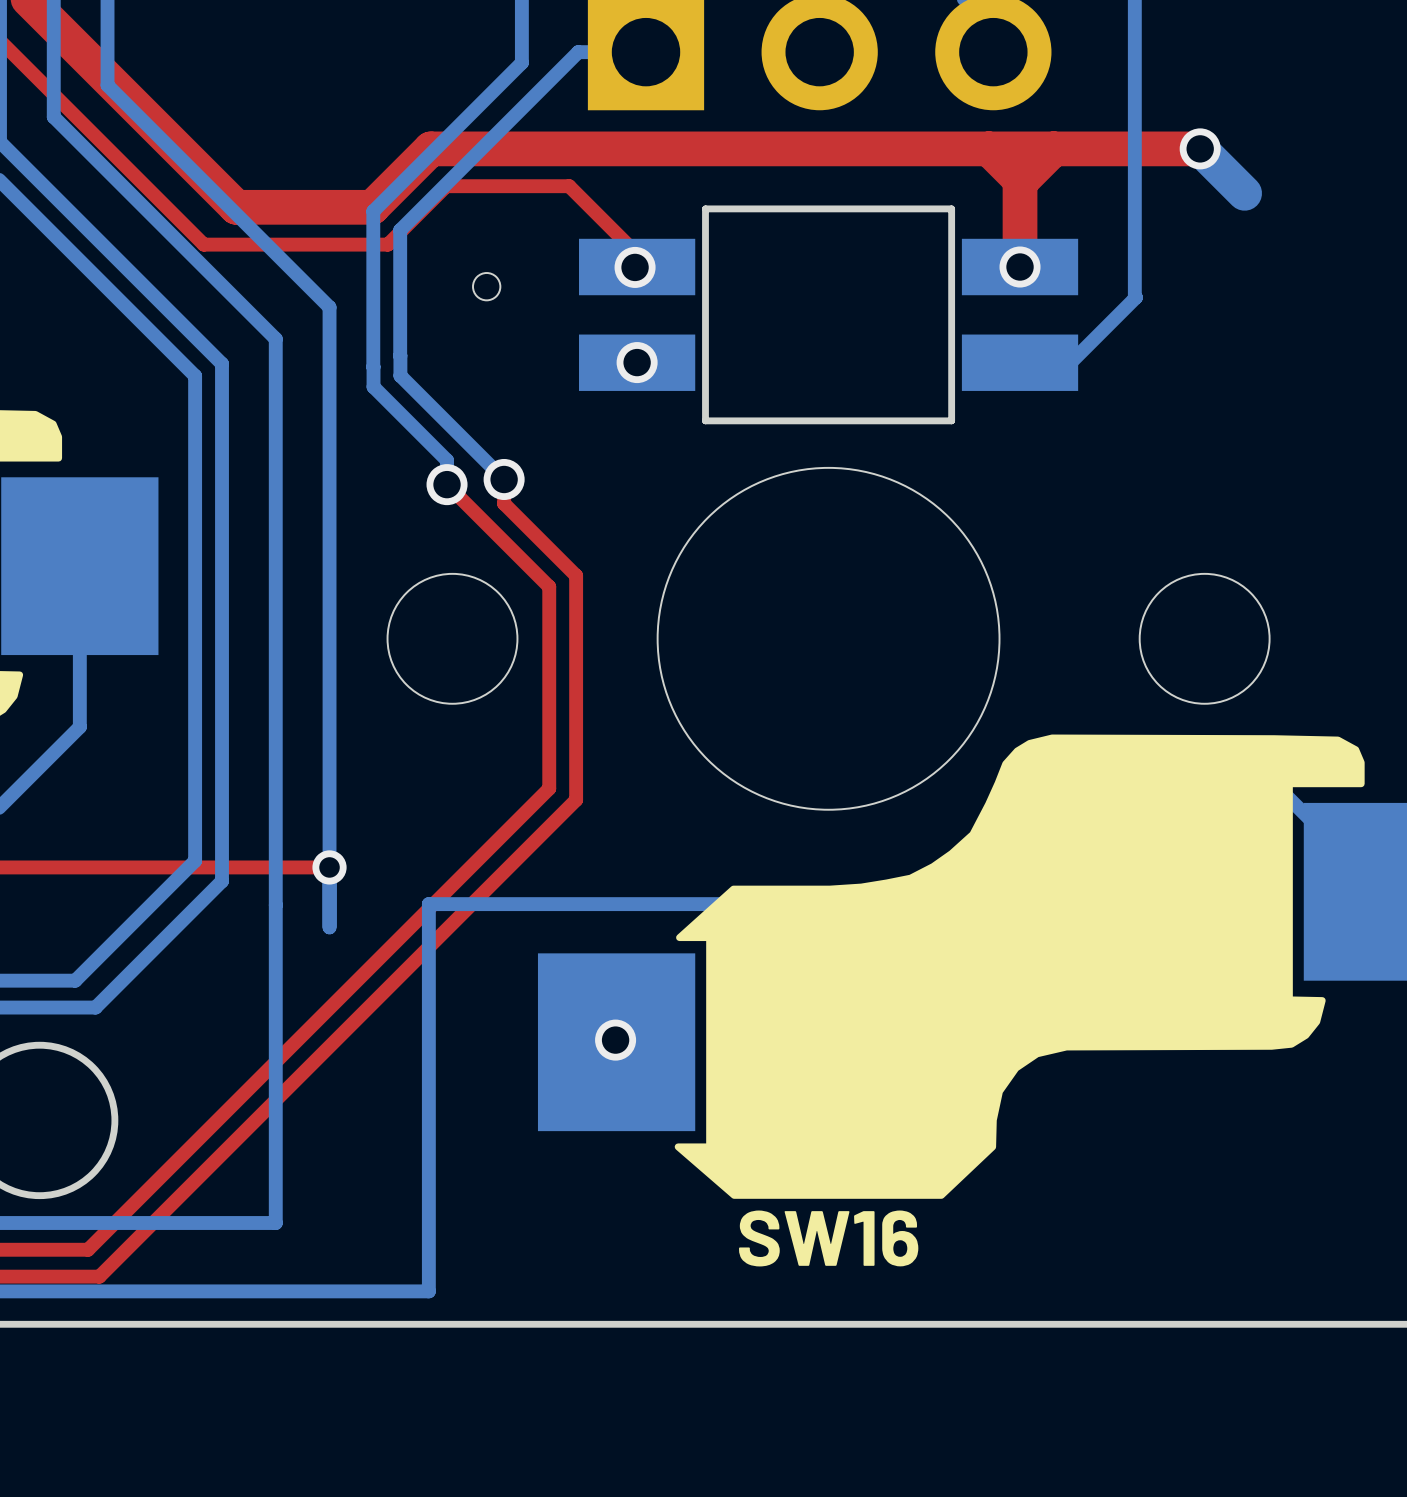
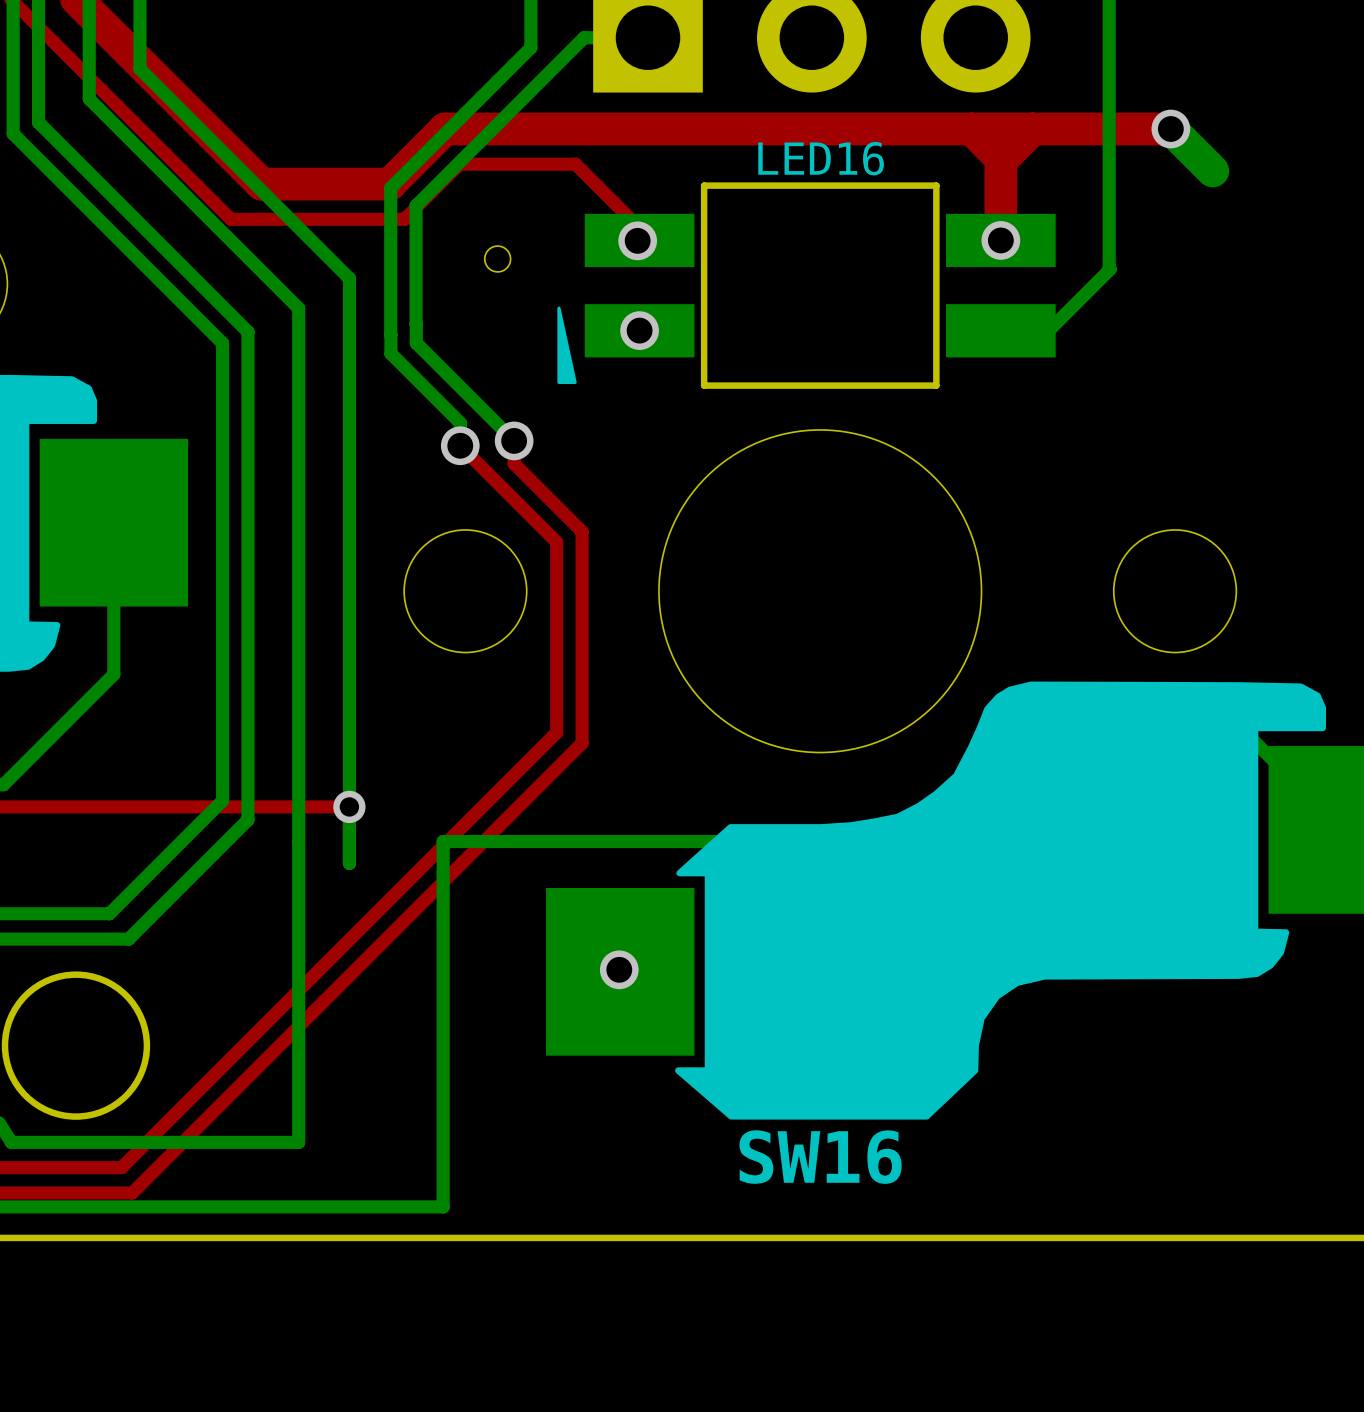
LED16: none -> (806, 285)

